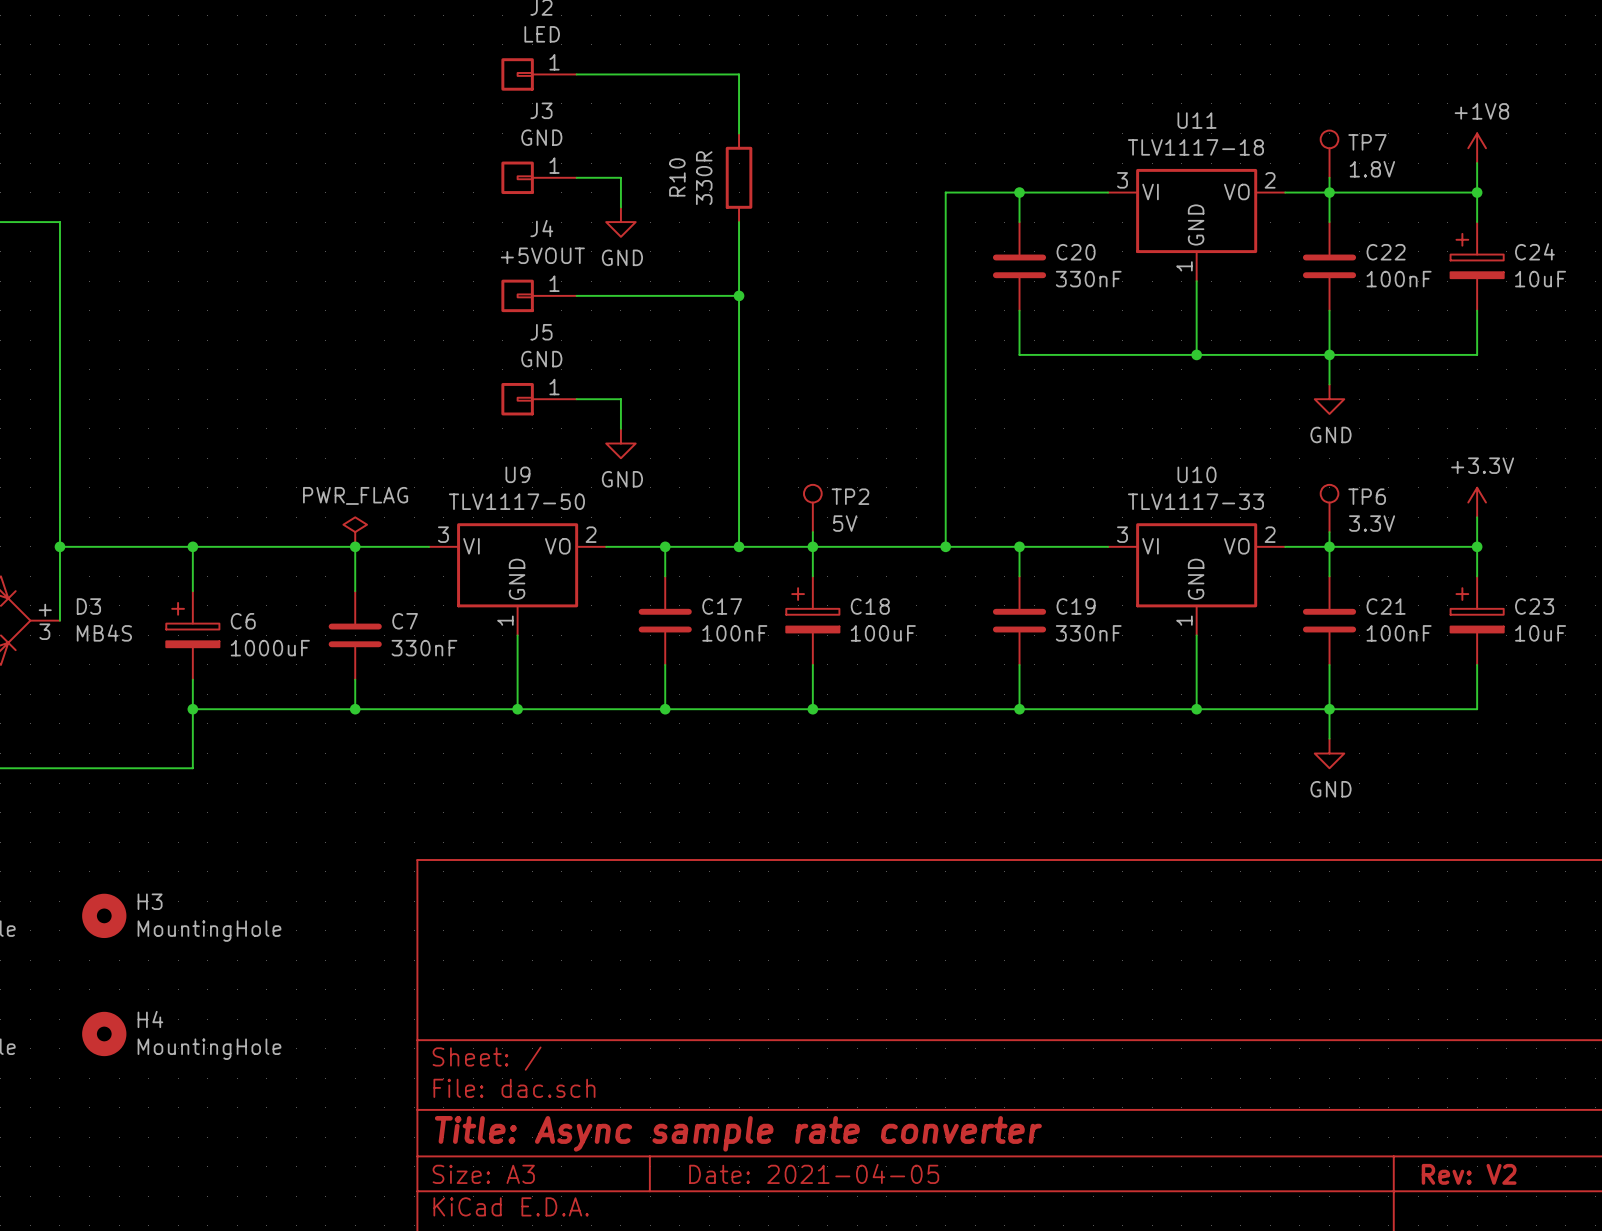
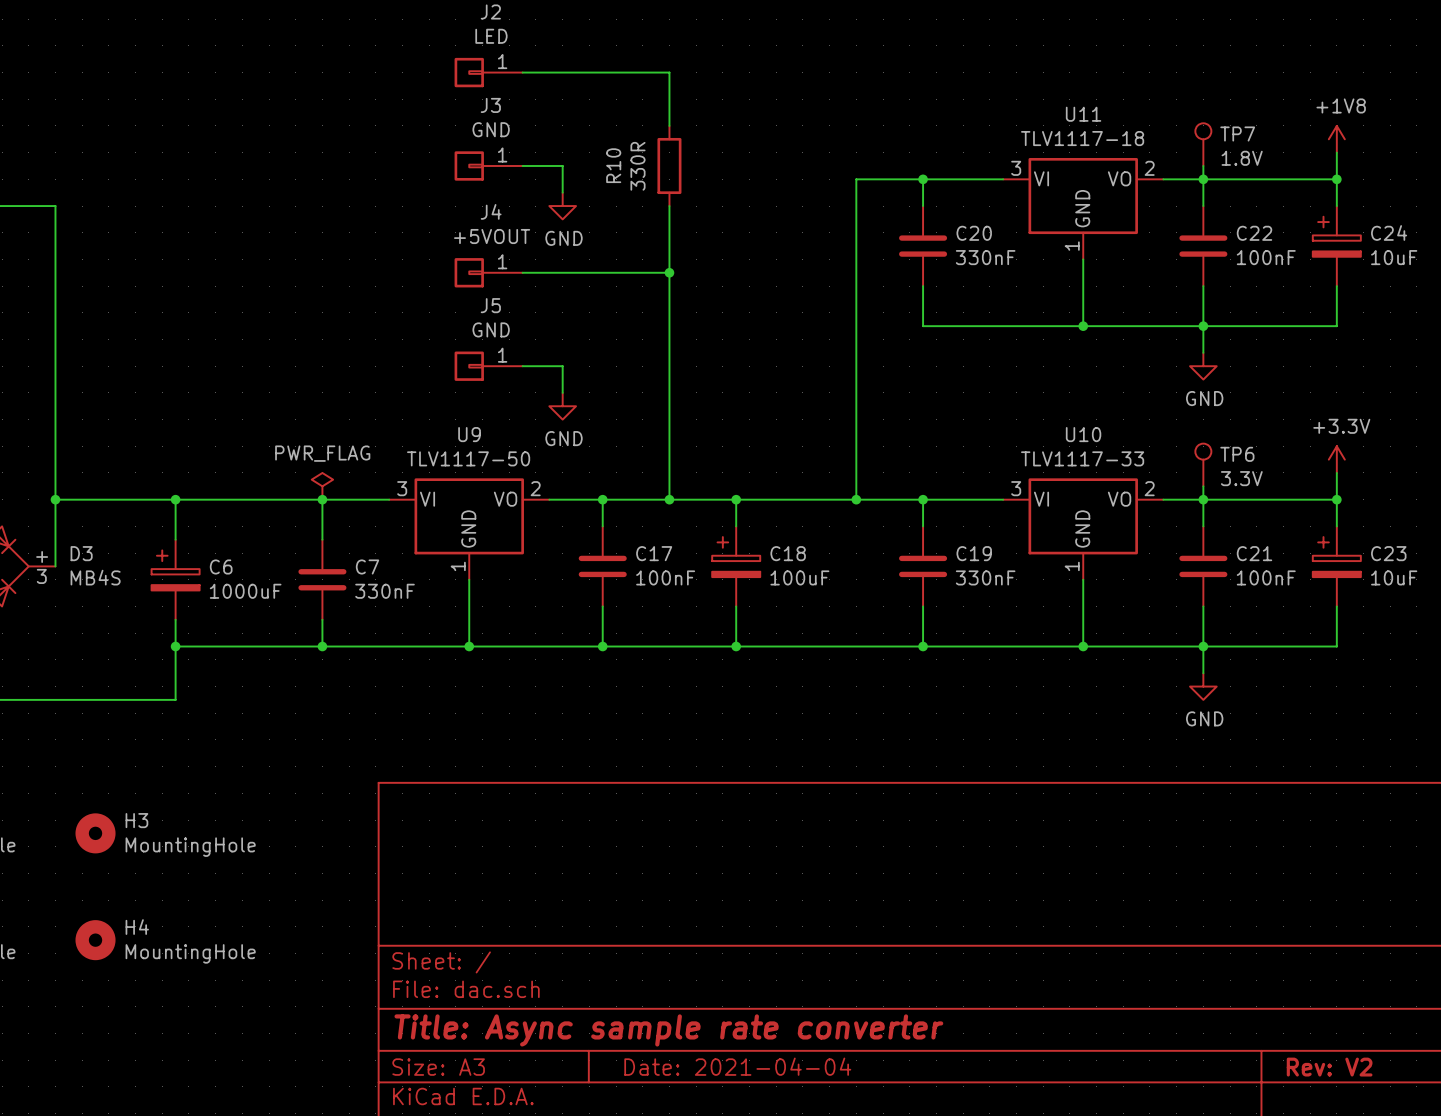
TP2: 5V (812, 508) -> none
wire: (812, 532) (812, 546) -> none
title block: Date: 2021-04-05 (814, 1173) -> Date: 2021-04-04 (737, 1066)

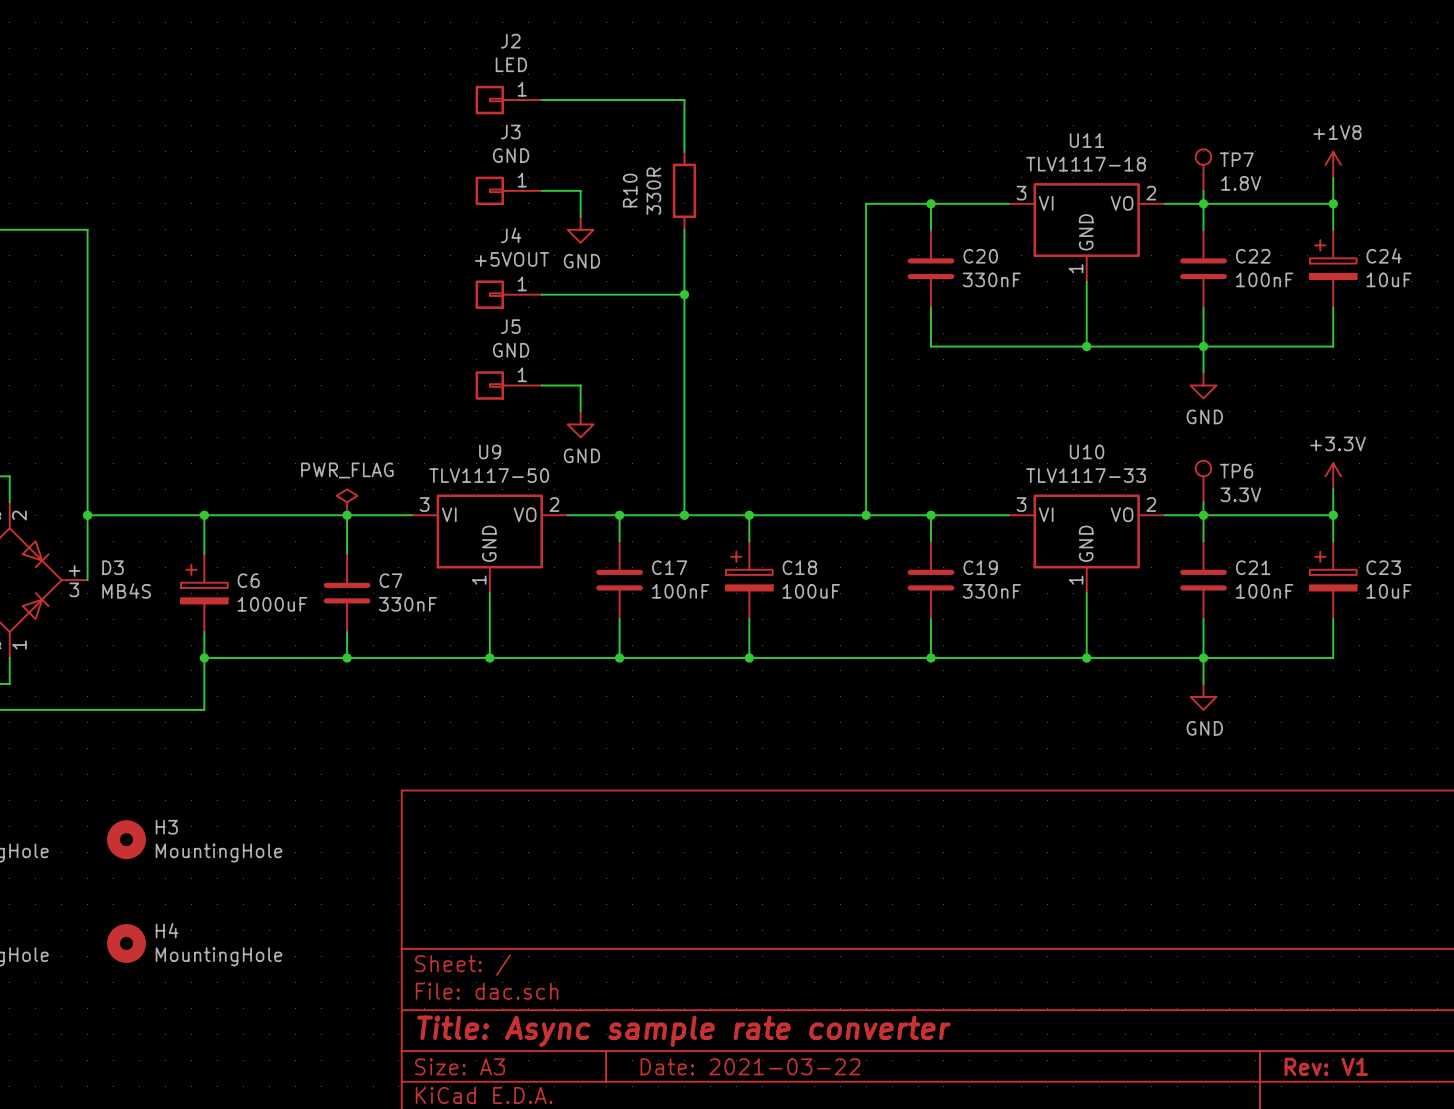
title block: Date: 2021-04-04 (737, 1066) -> Date: 2021-03-22 (750, 1066)
title block: Rev: V2 (1329, 1067) -> Rev: V1 (1326, 1066)

